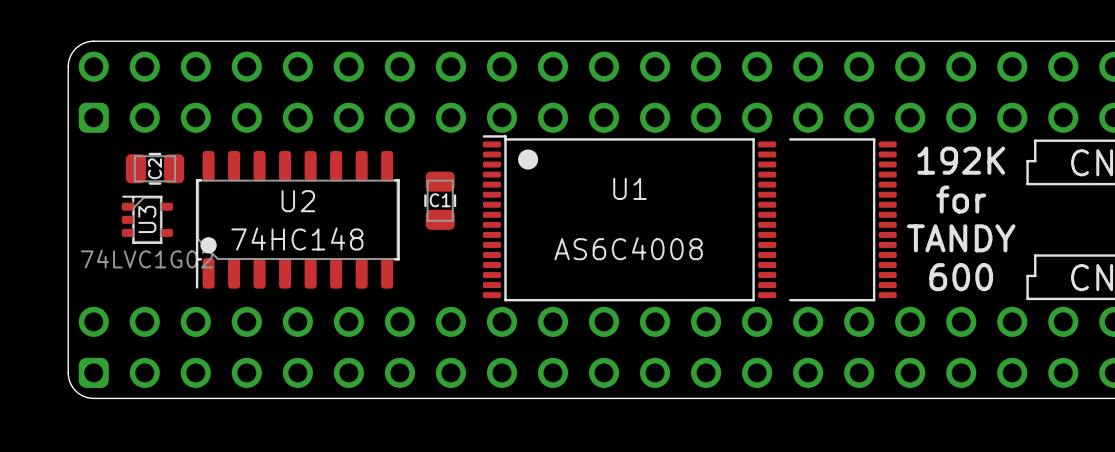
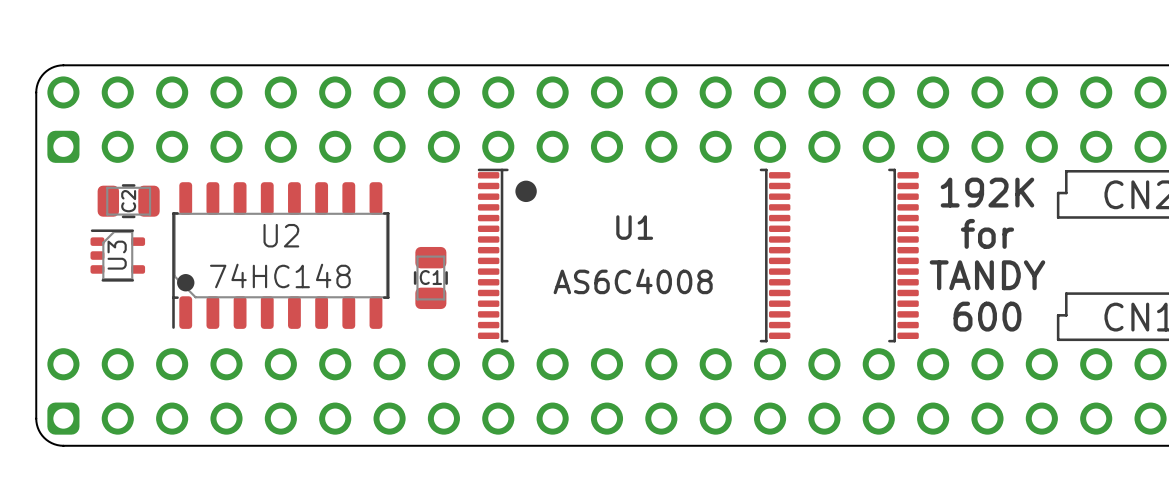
U1 footprint: [482, 135, 897, 302] -> [477, 168, 919, 343]
U3 footprint: [121, 195, 173, 244] -> [90, 229, 146, 282]
C1 position: (440, 200) -> (430, 278)
U3 value: 74LVC1G02 (146, 259) -> none

